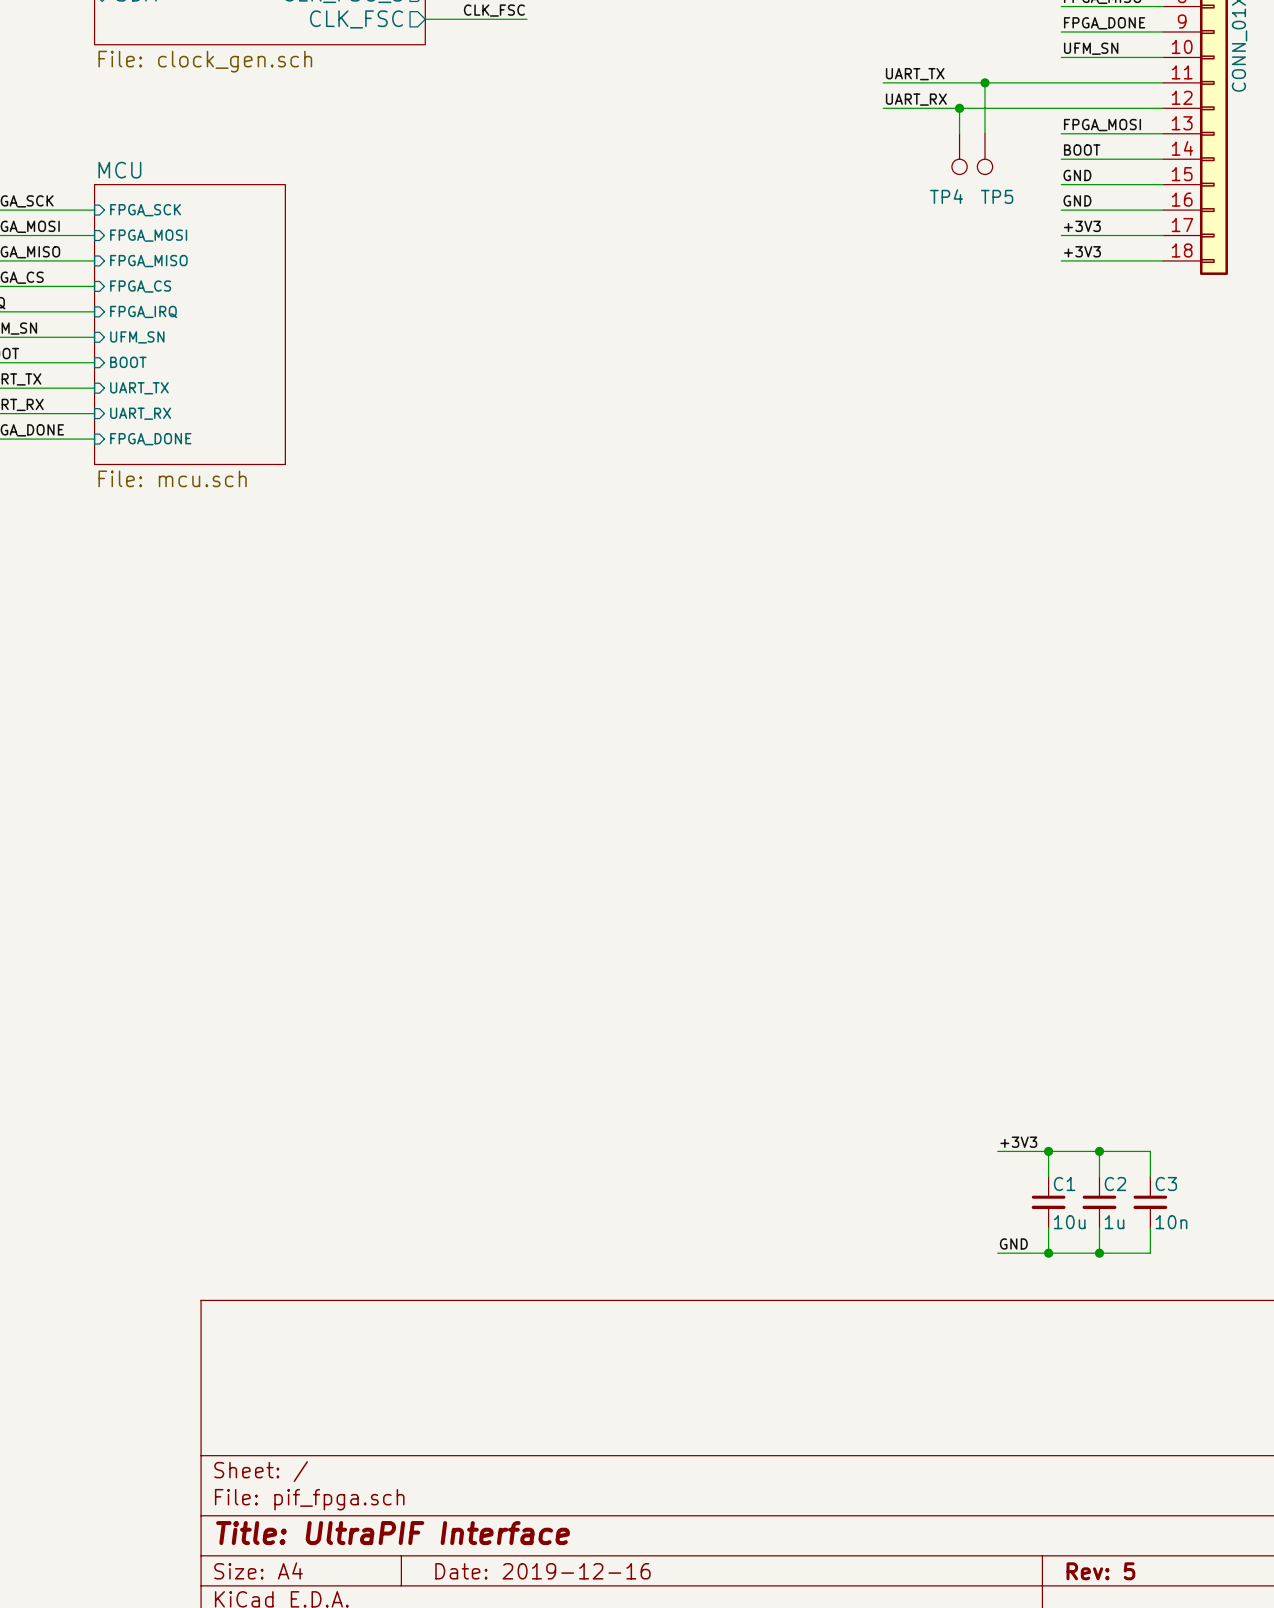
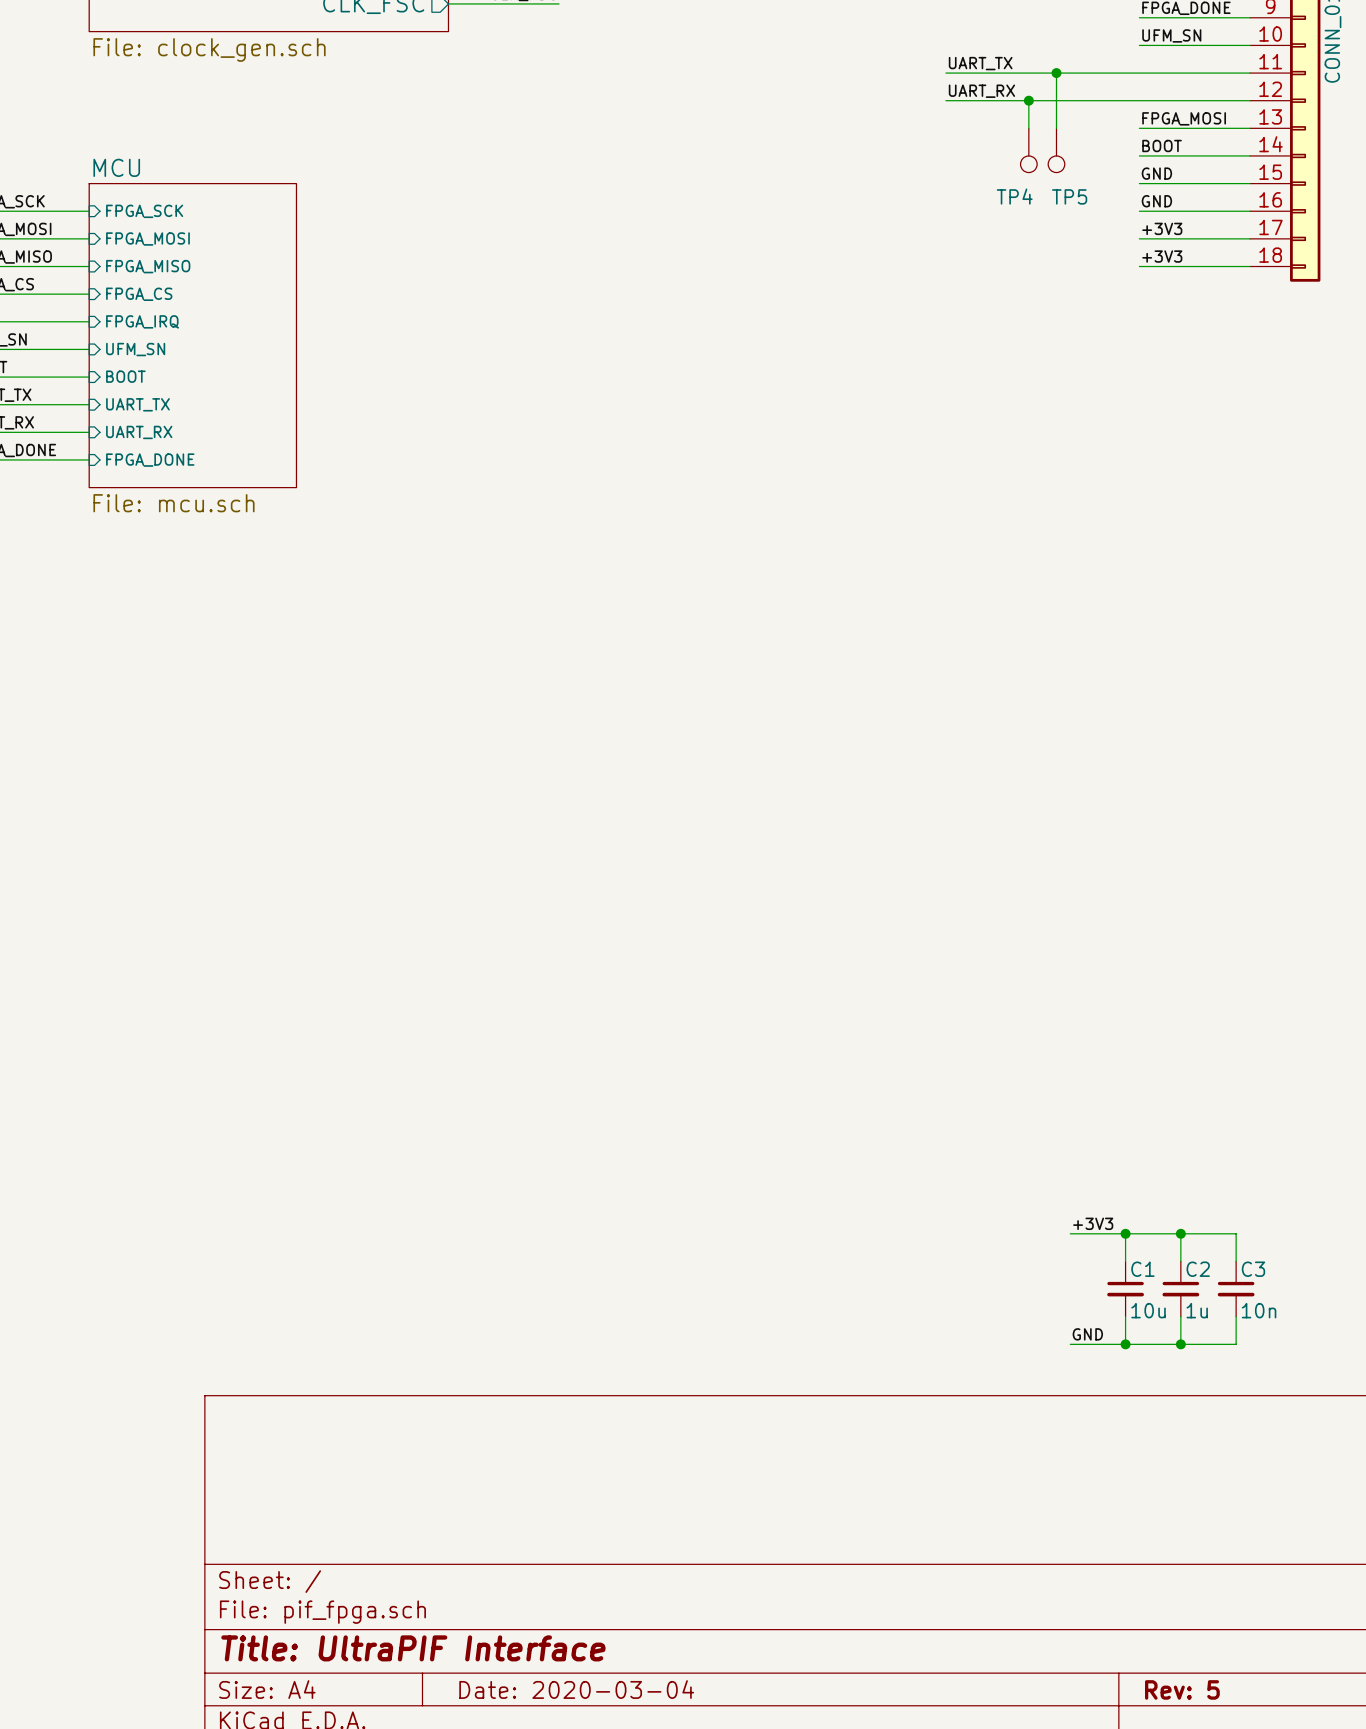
title block: Date: 2019-12-16 (542, 1571) -> Date: 2020-03-04 (576, 1689)

